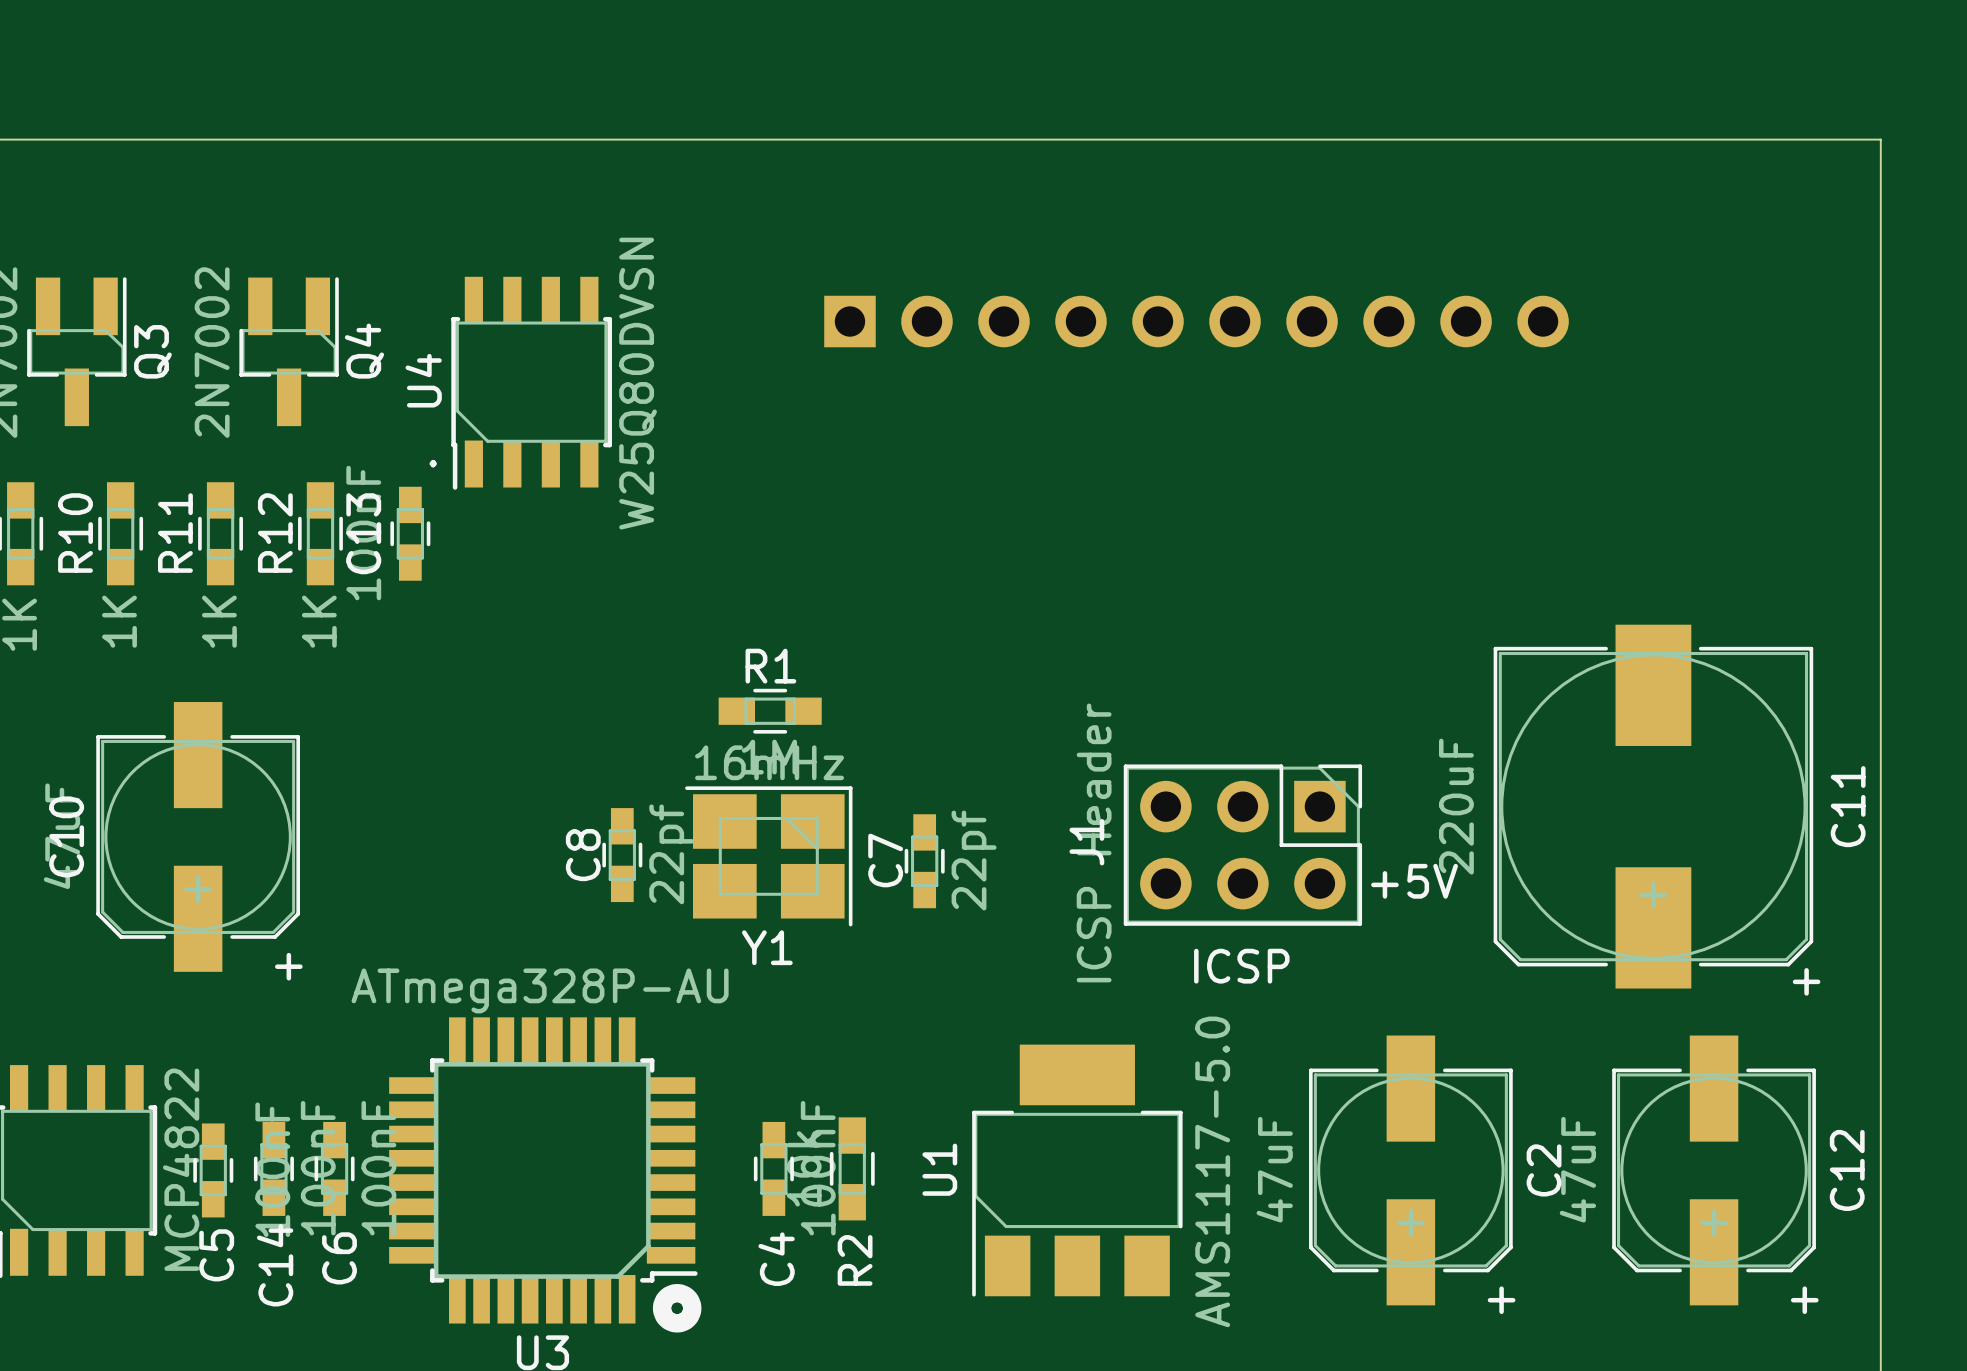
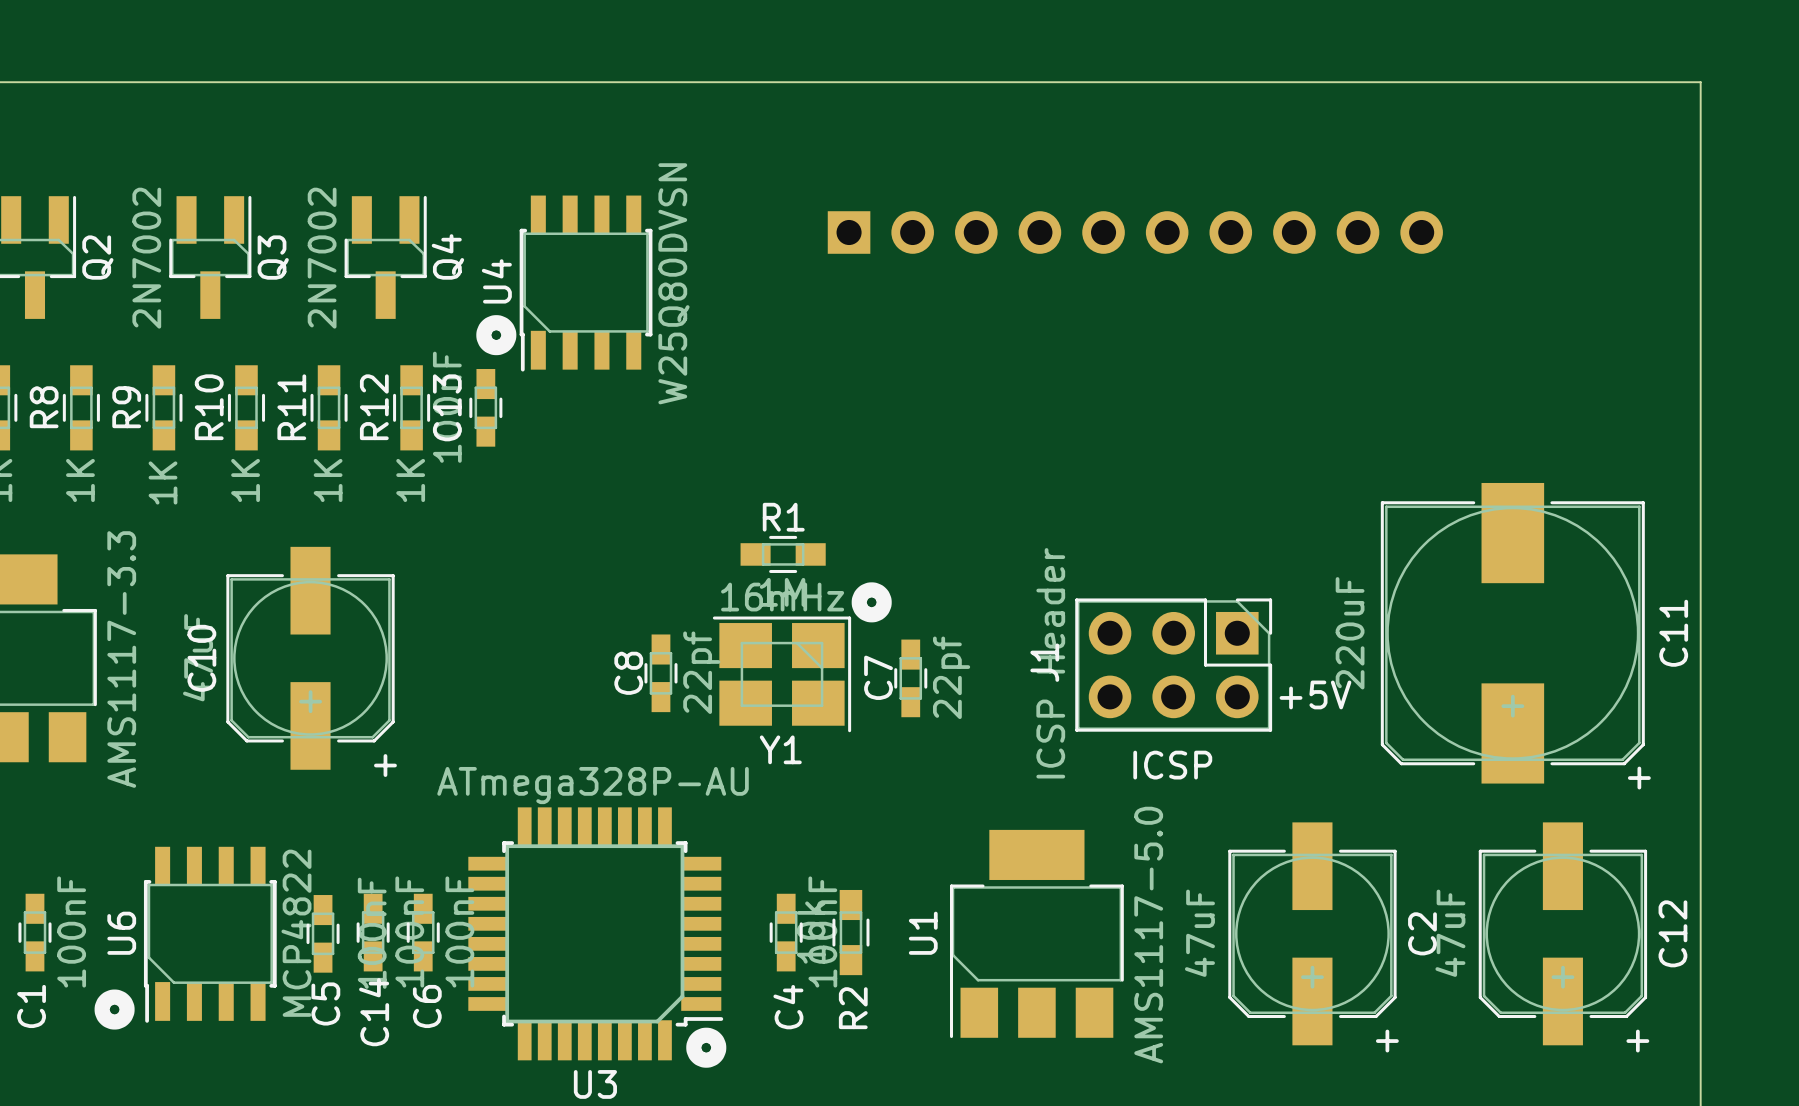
drawing: none -> [476, 315, 517, 356]
text: . (433, 463) -> none
drawing: none -> [851, 582, 892, 623]

